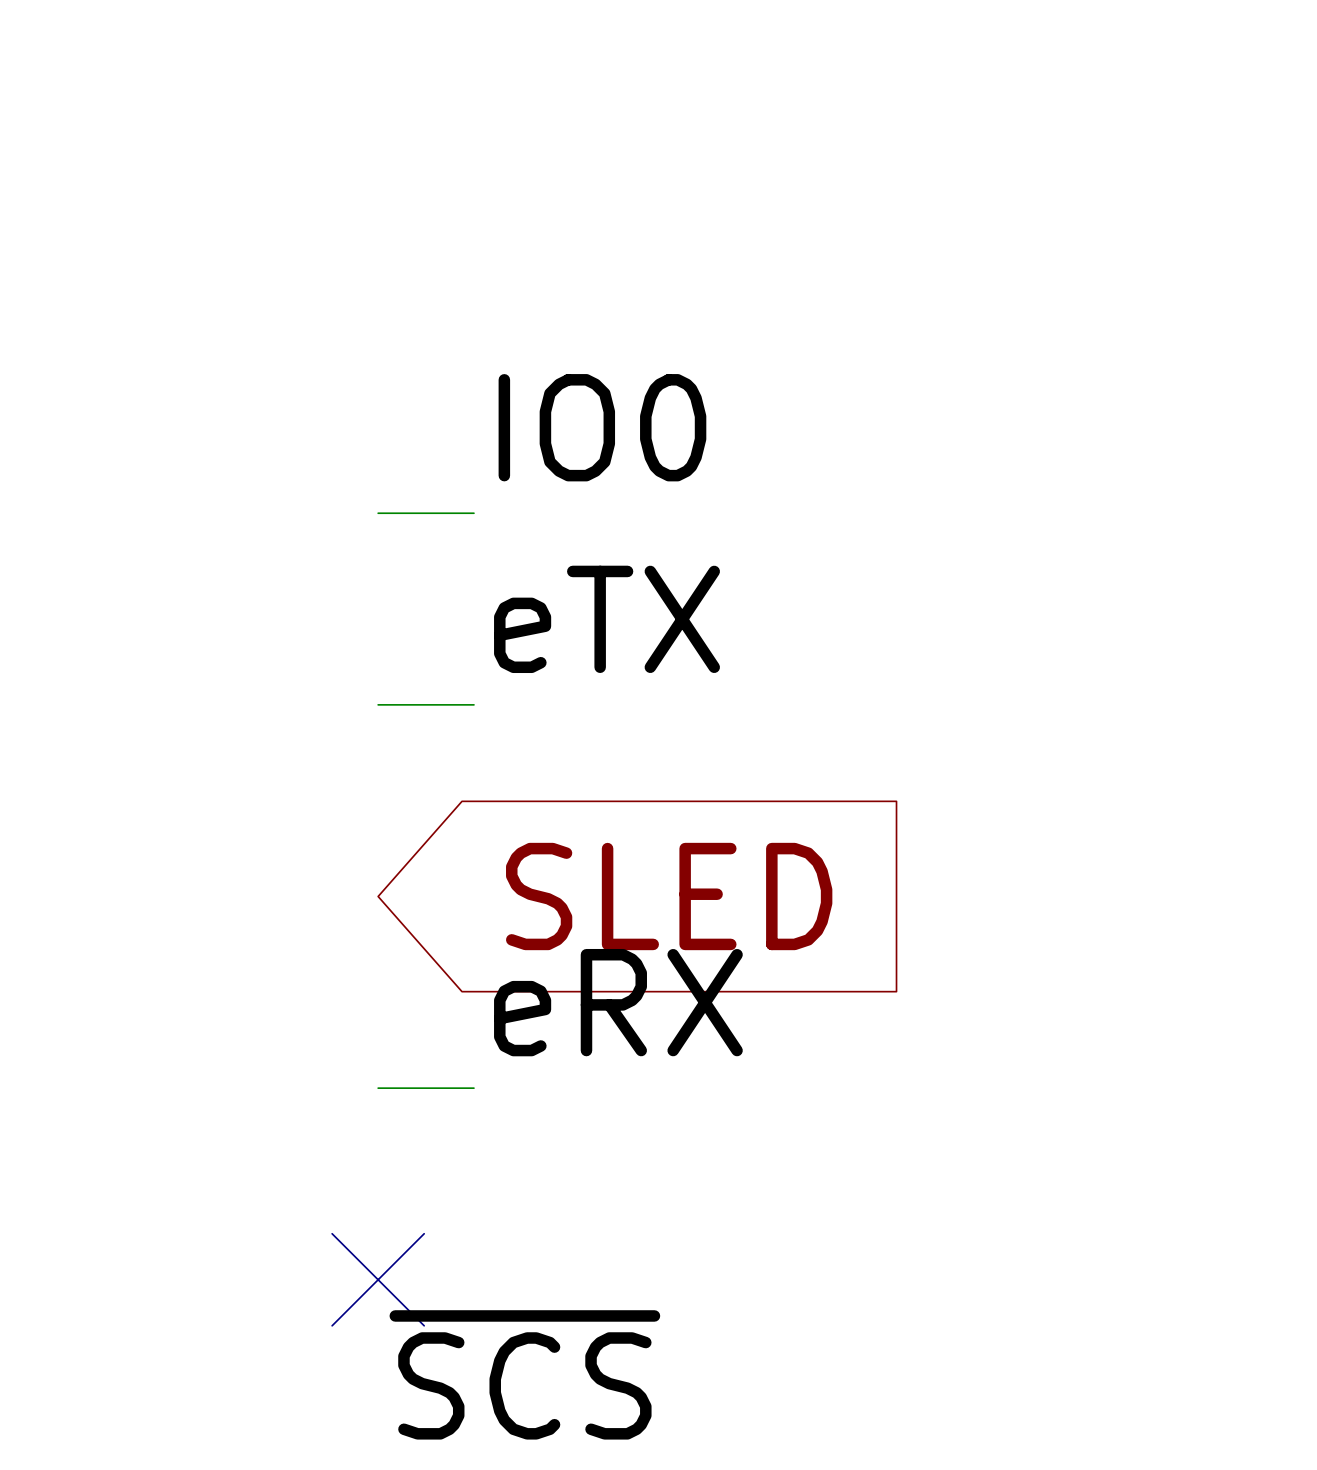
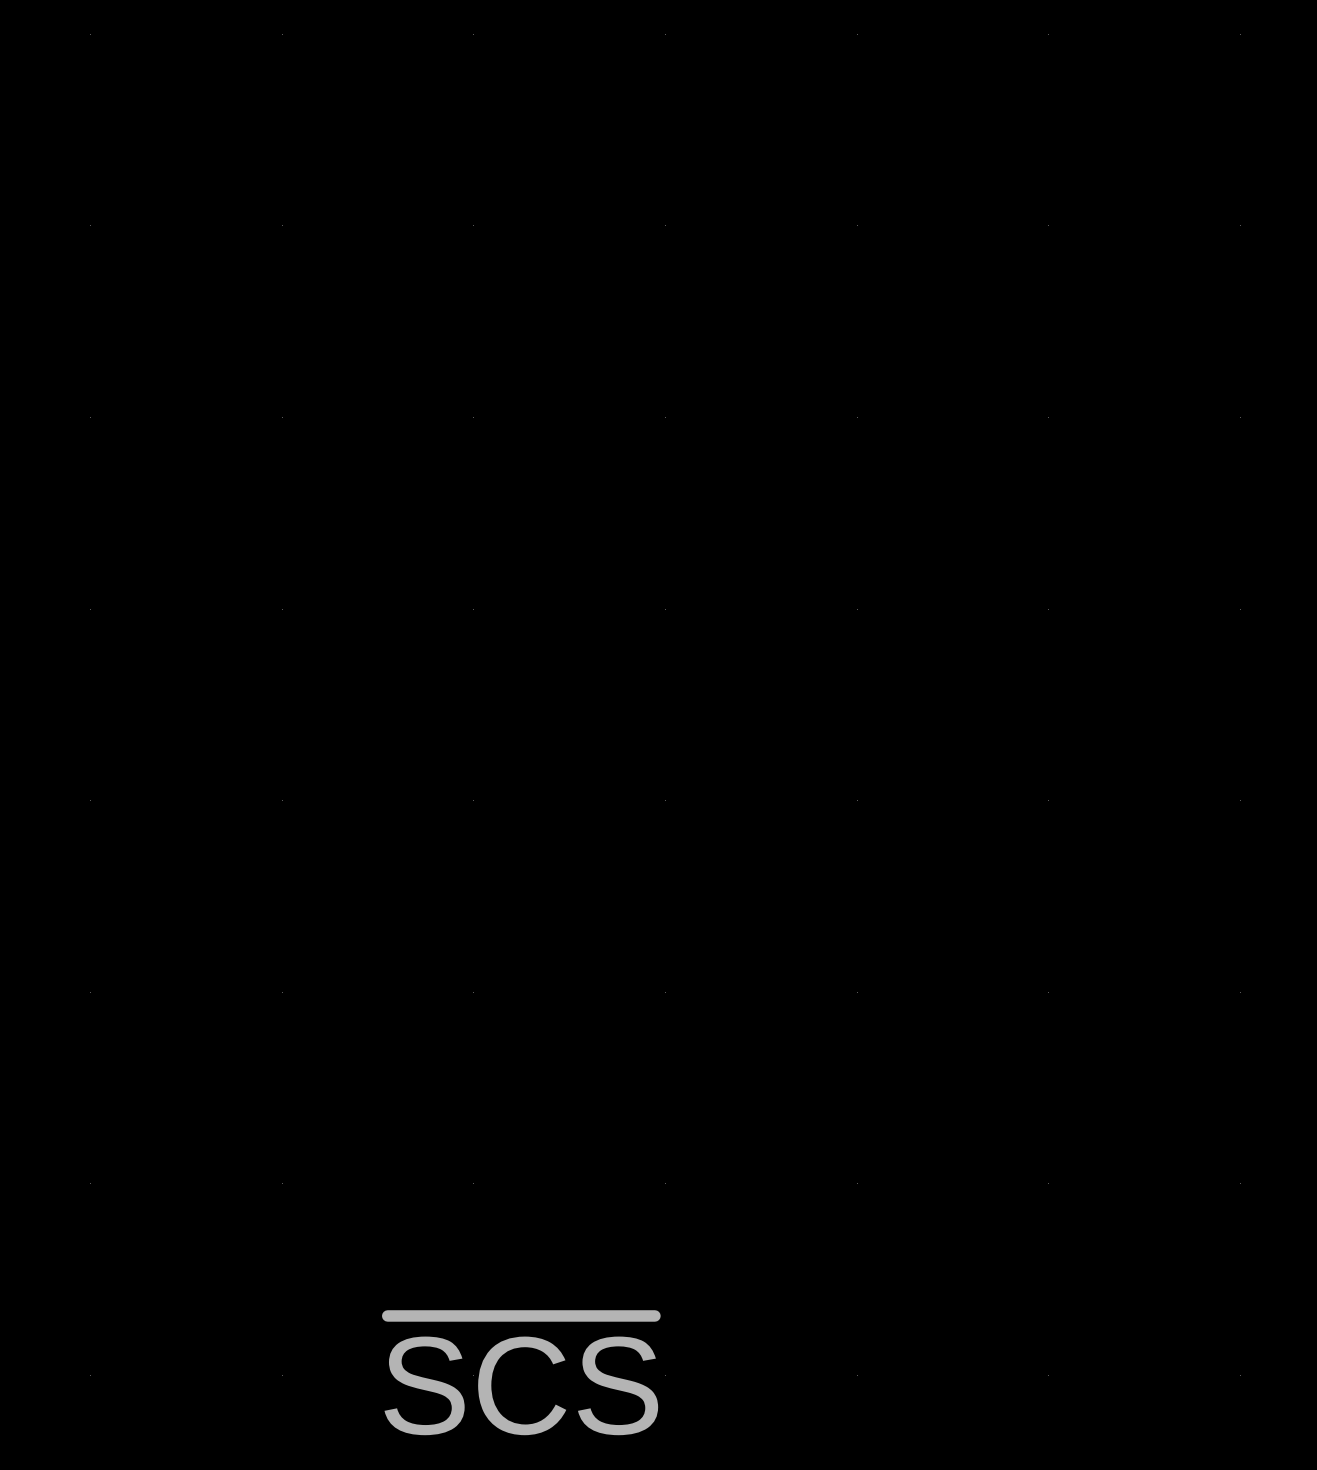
label: IO0 (602, 427) -> none
wire: (378, 513) (473, 513) -> none
label: eTX (607, 619) -> none
wire: (378, 704) (473, 704) -> none
global label: SLED (669, 896) -> none
label: eRX (618, 1002) -> none
wire: (378, 1088) (473, 1088) -> none
no-connect mark: (378, 1279) -> none

